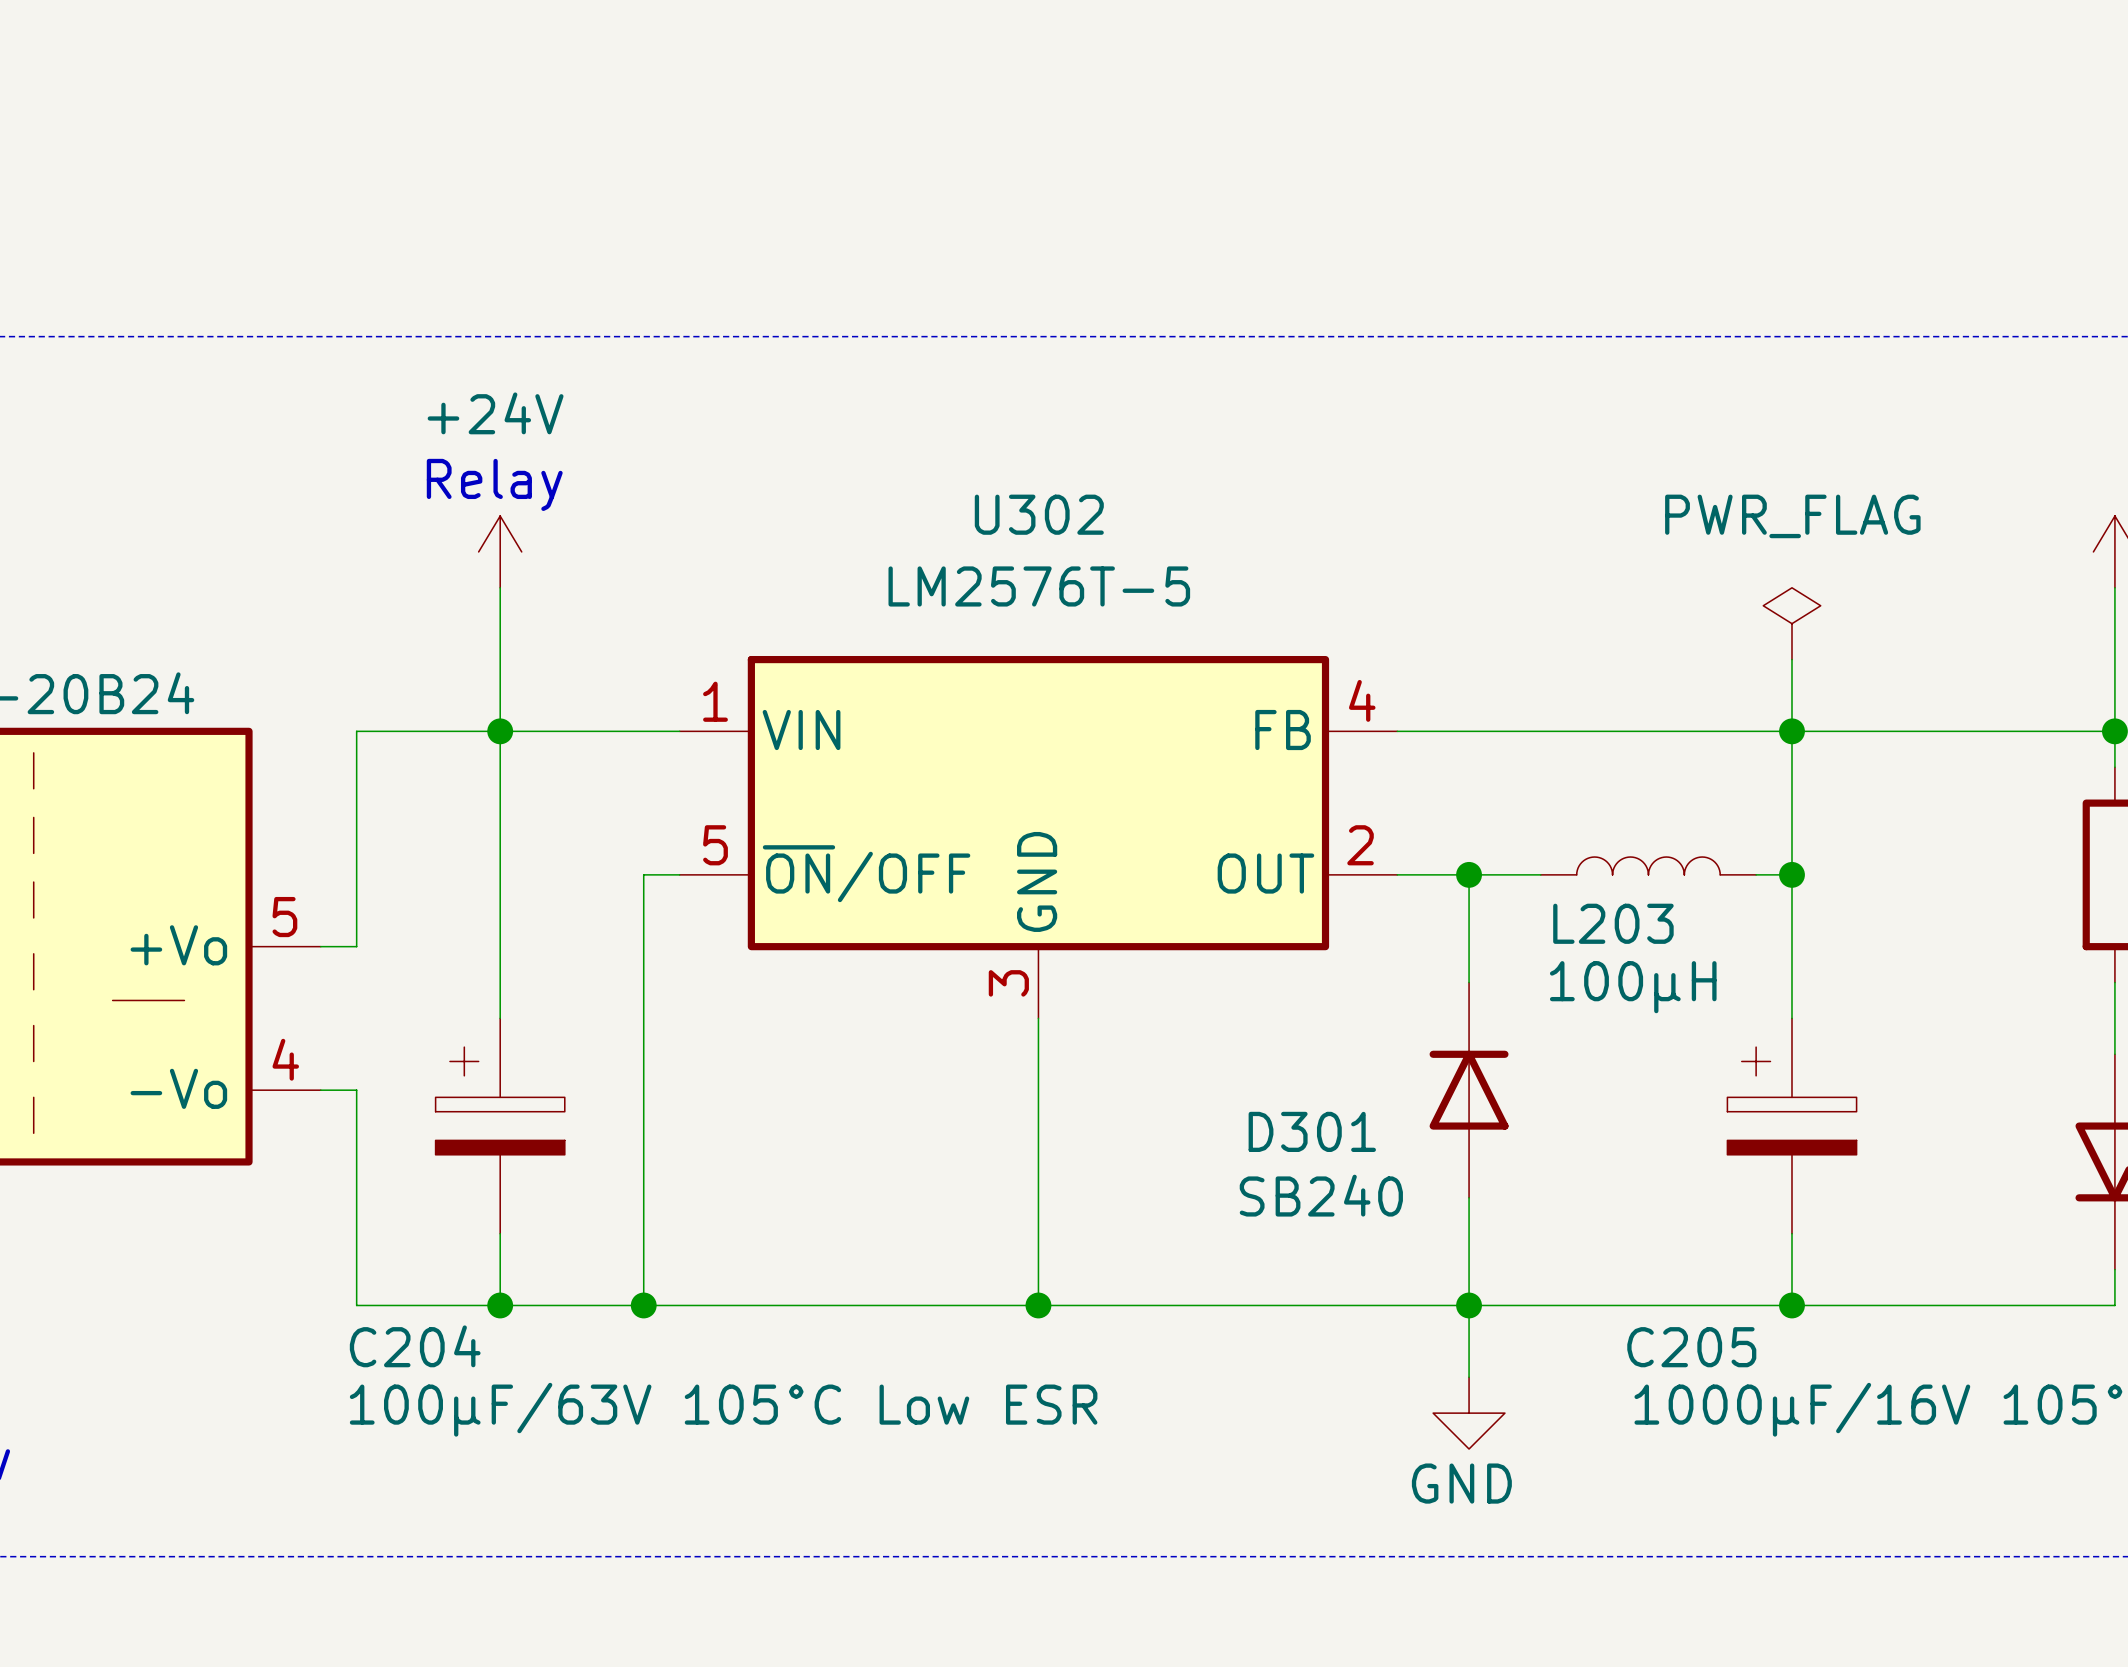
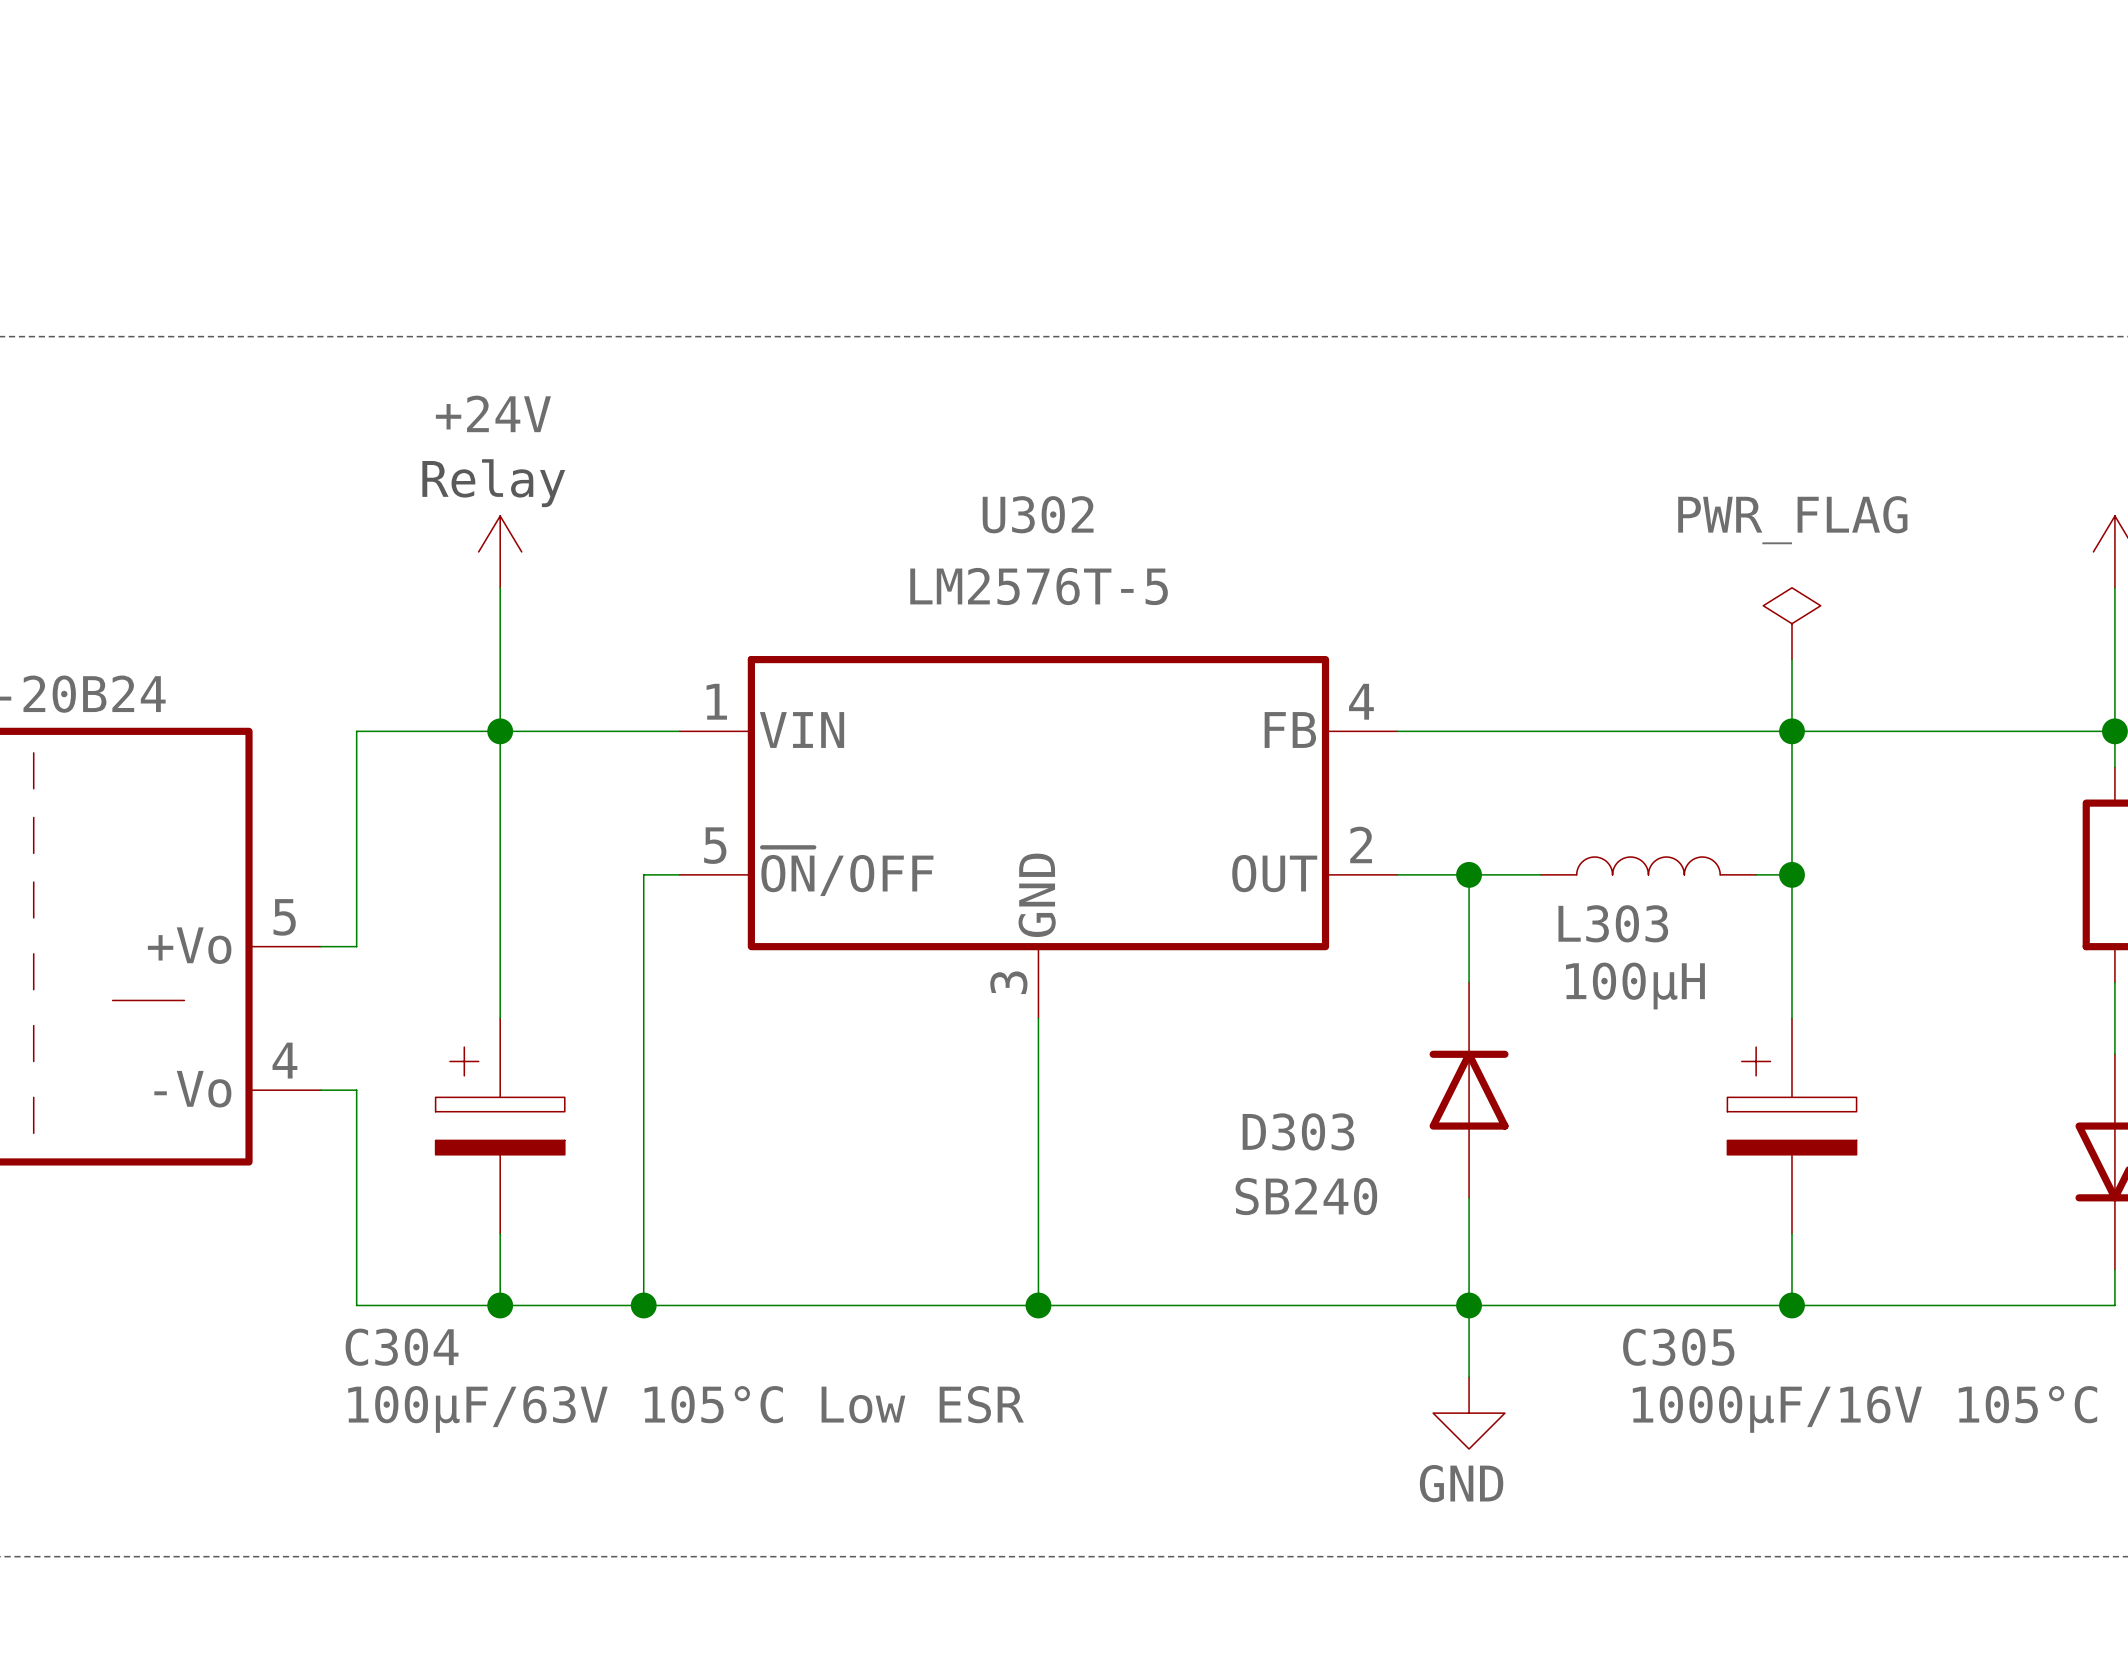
L203 name: L203 (1613, 923) -> L303 (1613, 923)
D301 name: D301 (1312, 1131) -> D303 (1298, 1131)
C204 name: C204 (415, 1346) -> C304 (402, 1347)
C205 name: C205 (1691, 1347) -> C305 (1678, 1347)

